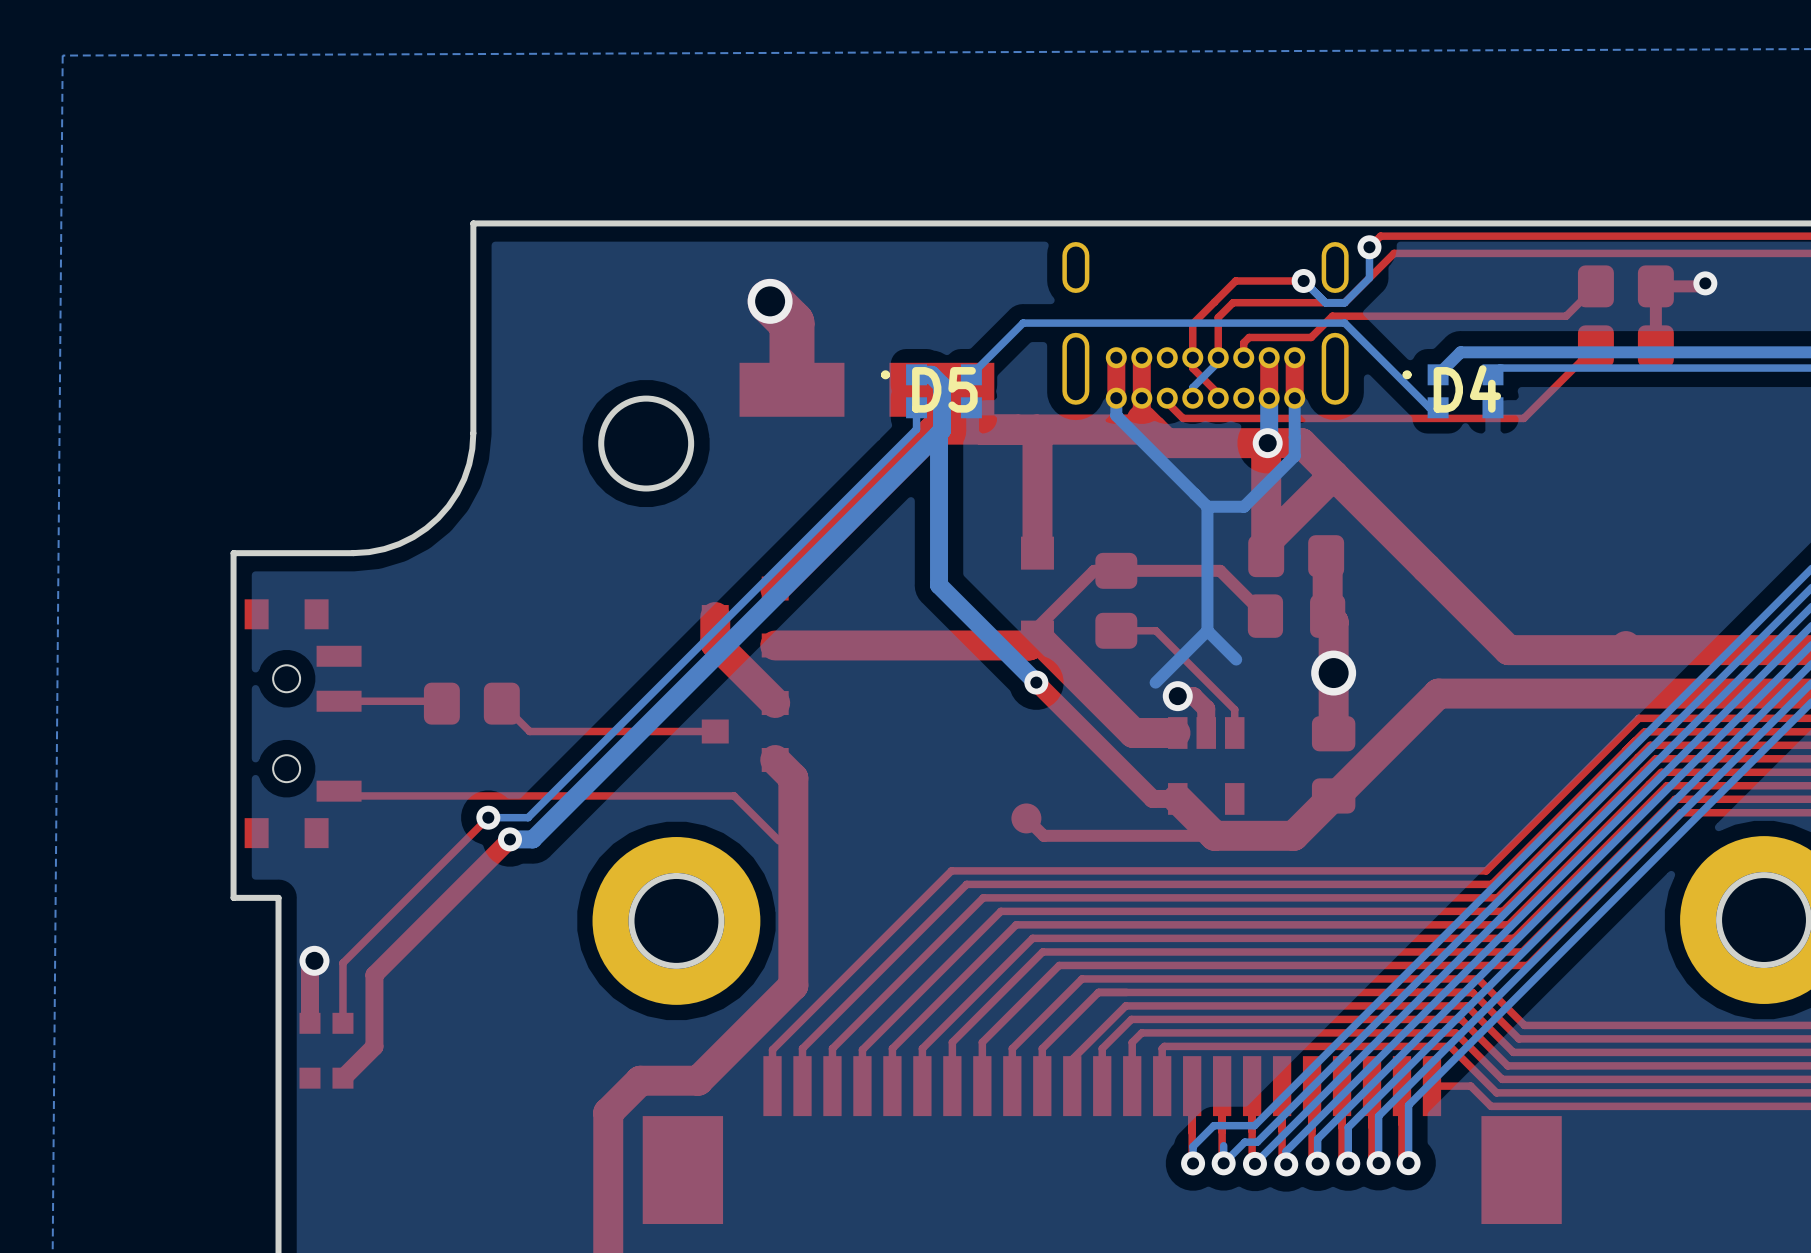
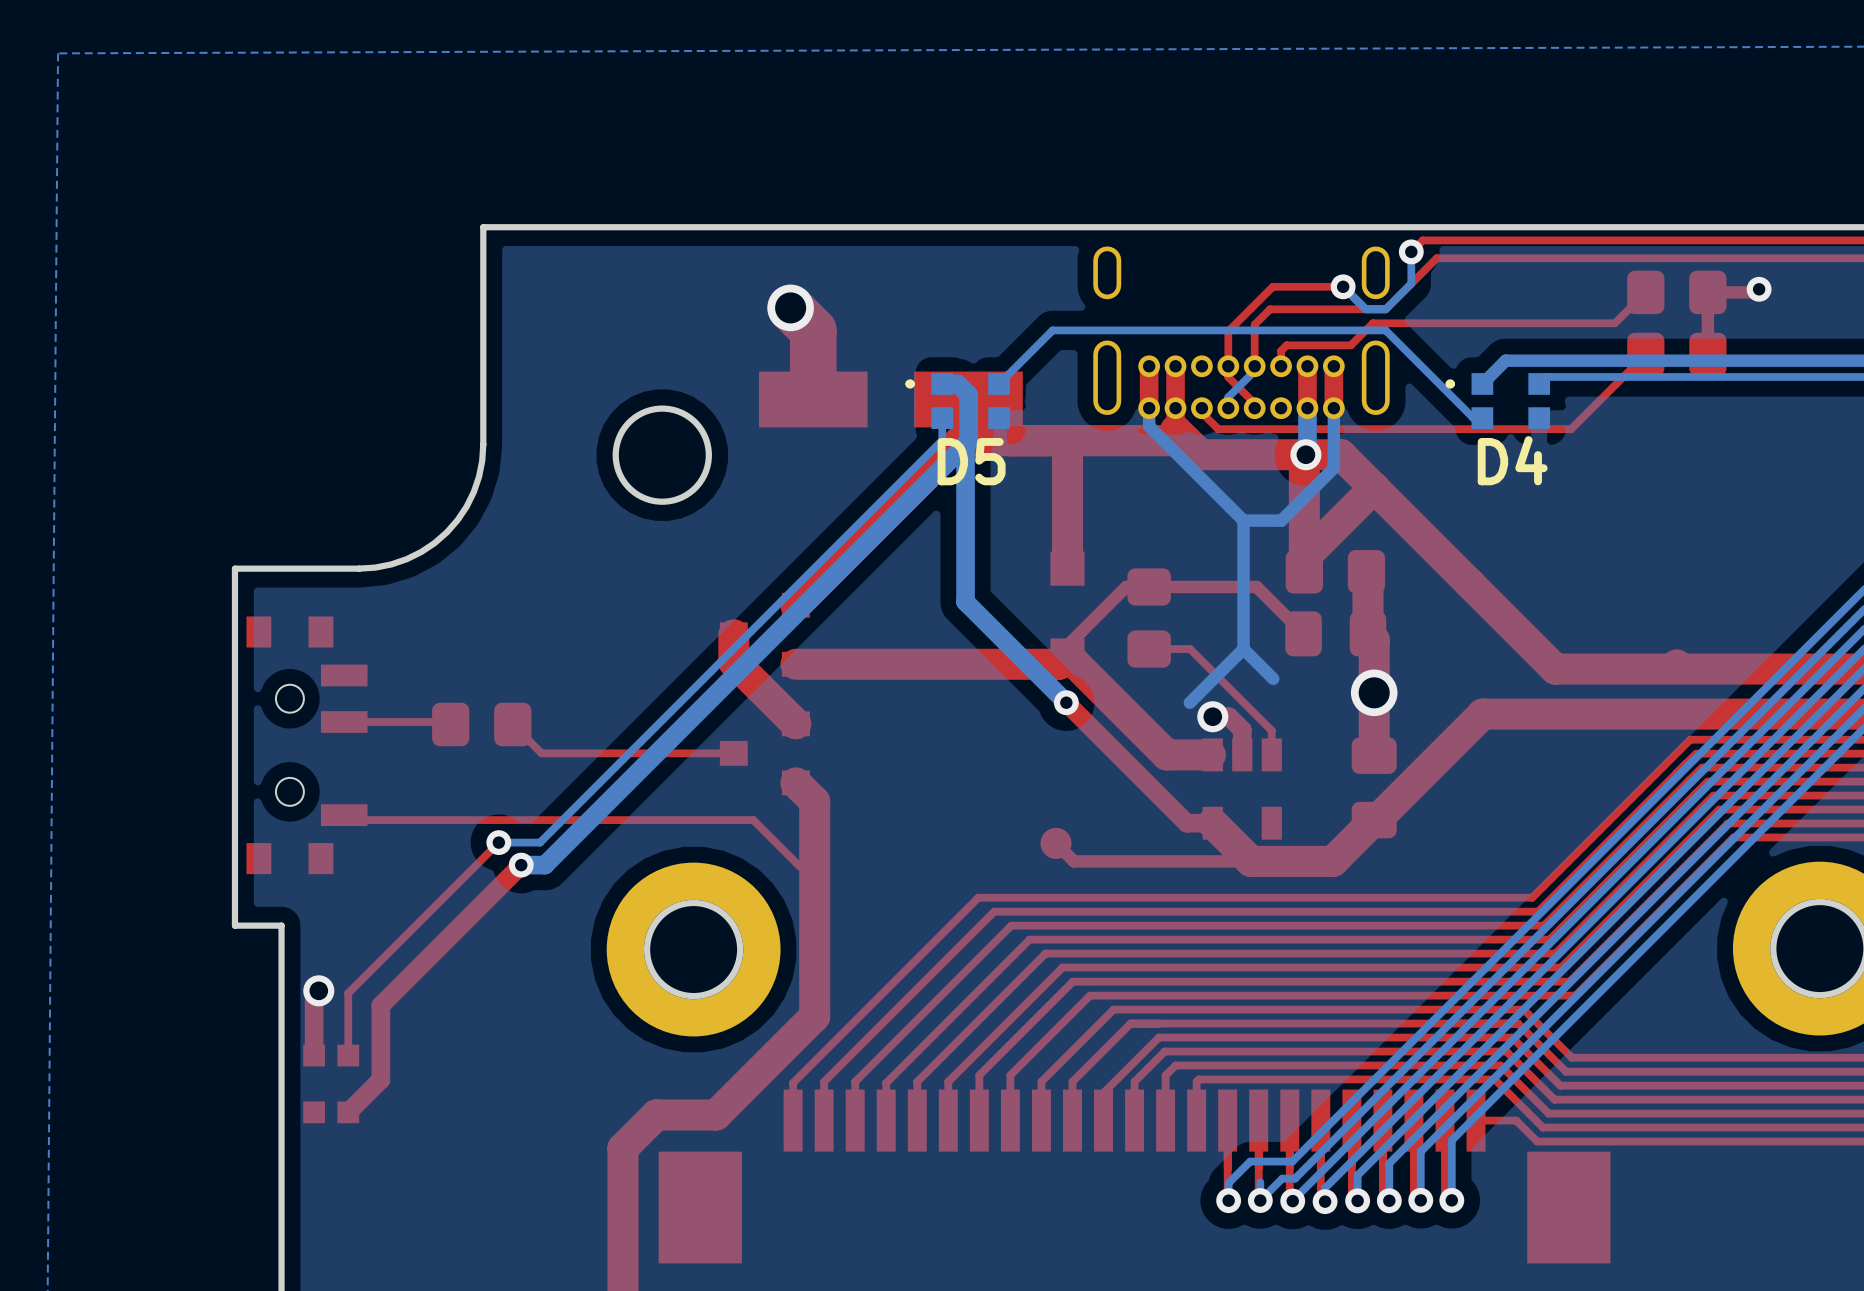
D4 name position: D4 (1467, 388) -> D4 (1512, 460)
D5 name position: D5 (944, 389) -> D5 (971, 461)

